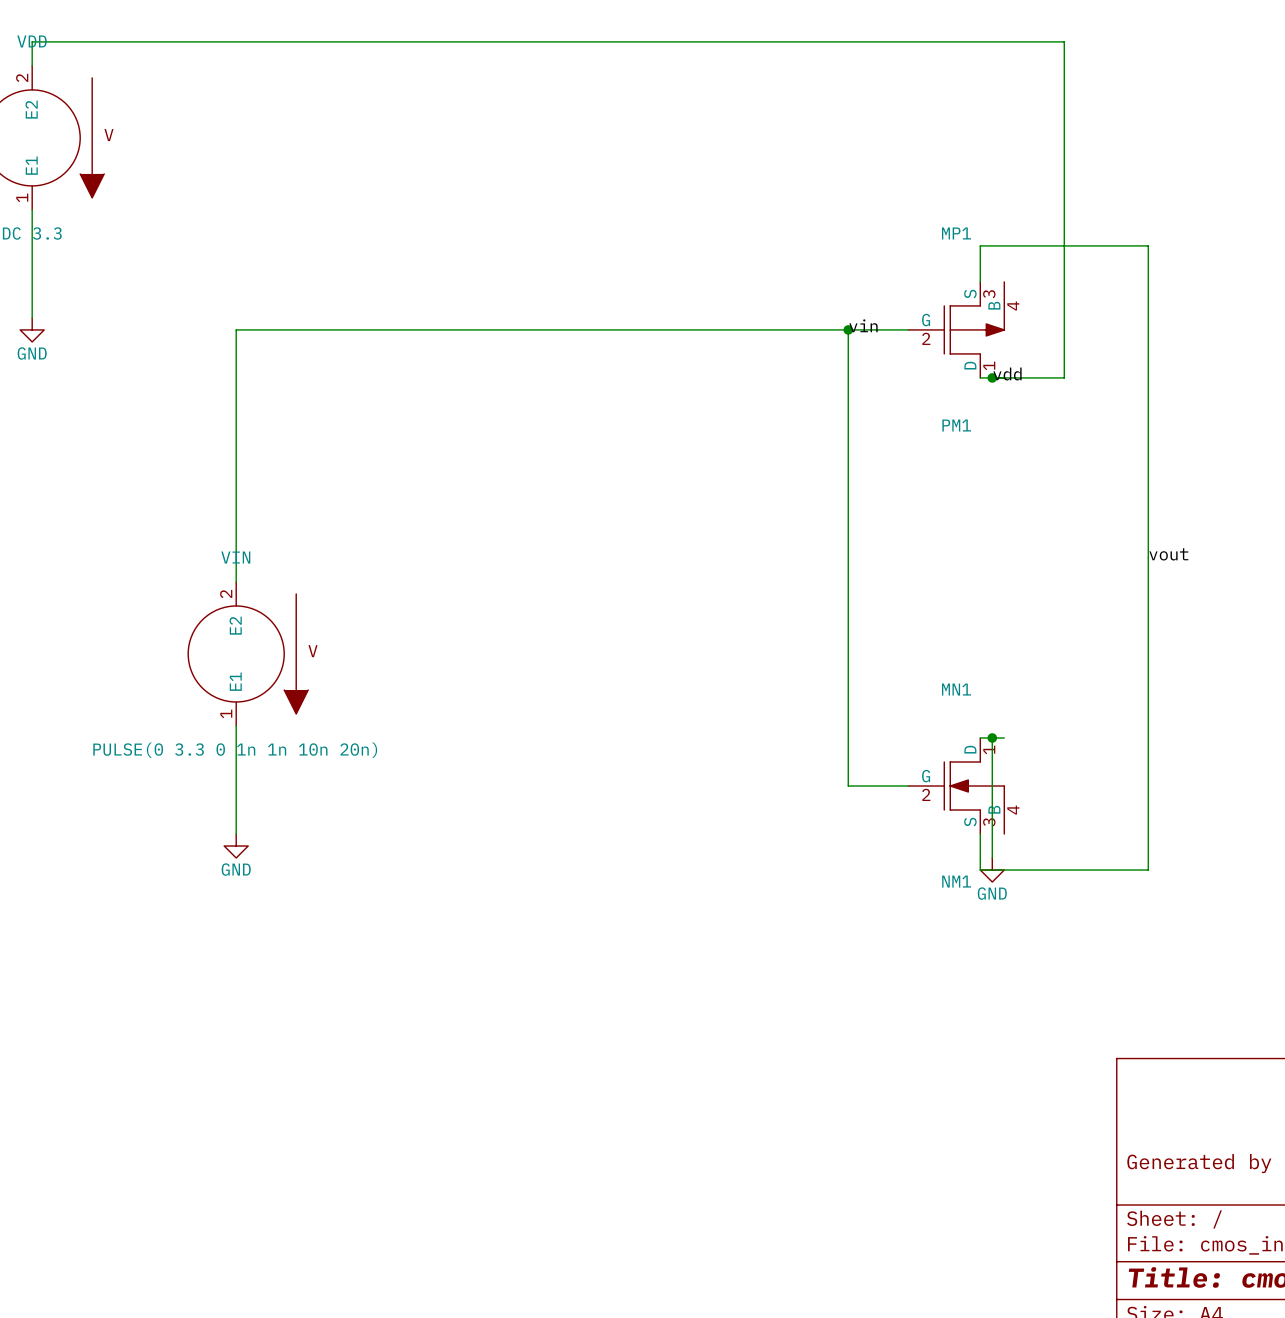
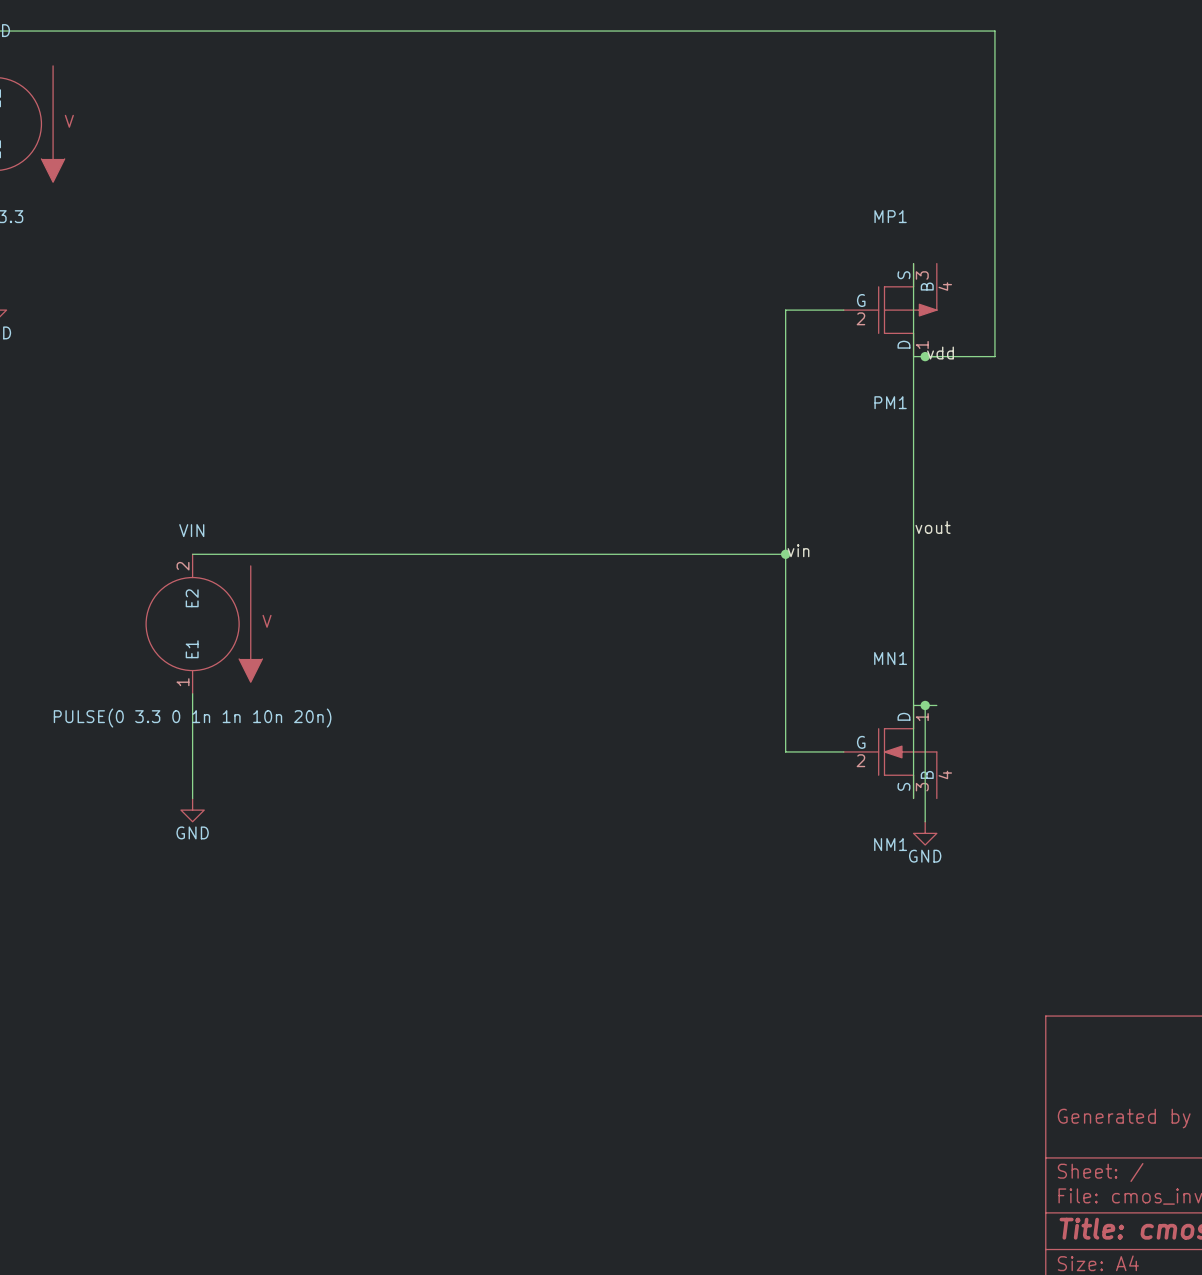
wire: (980, 281) (980, 245) (1148, 245) (1148, 870) (980, 870) (980, 834) -> (913, 263) (913, 798)
label: vin (863, 325) -> none
wire: (848, 329) (236, 329) (236, 581) -> (785, 554) (192, 554)
junction: (848, 329) -> none
label position: vout (1168, 554) -> vout (933, 527)
label: none -> vin (798, 550)
junction: none -> (785, 554)

